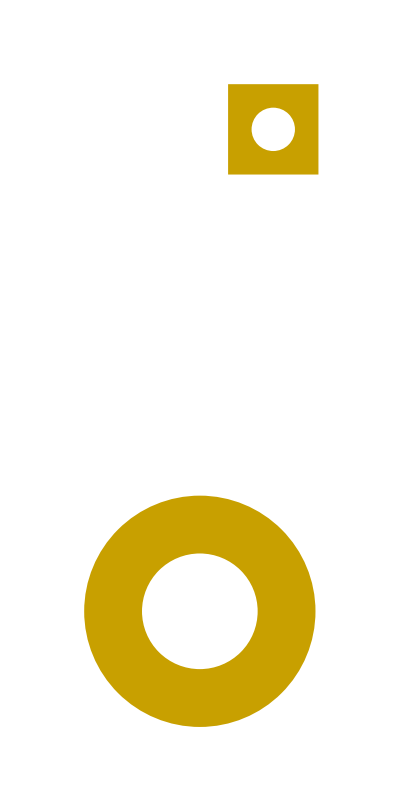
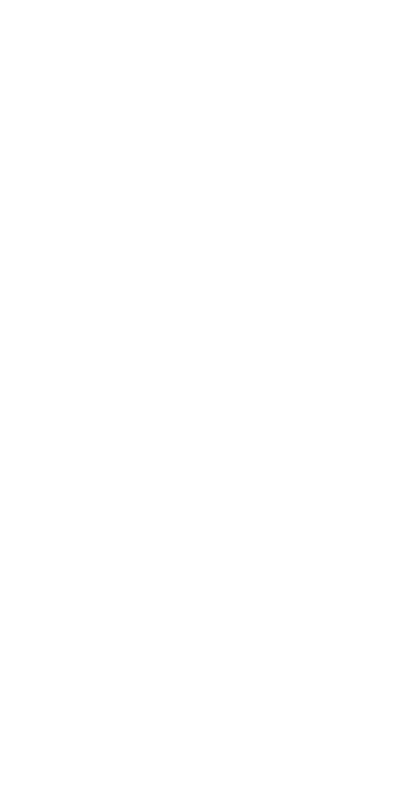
part: (273, 129) -> none
part: (199, 611) -> none

